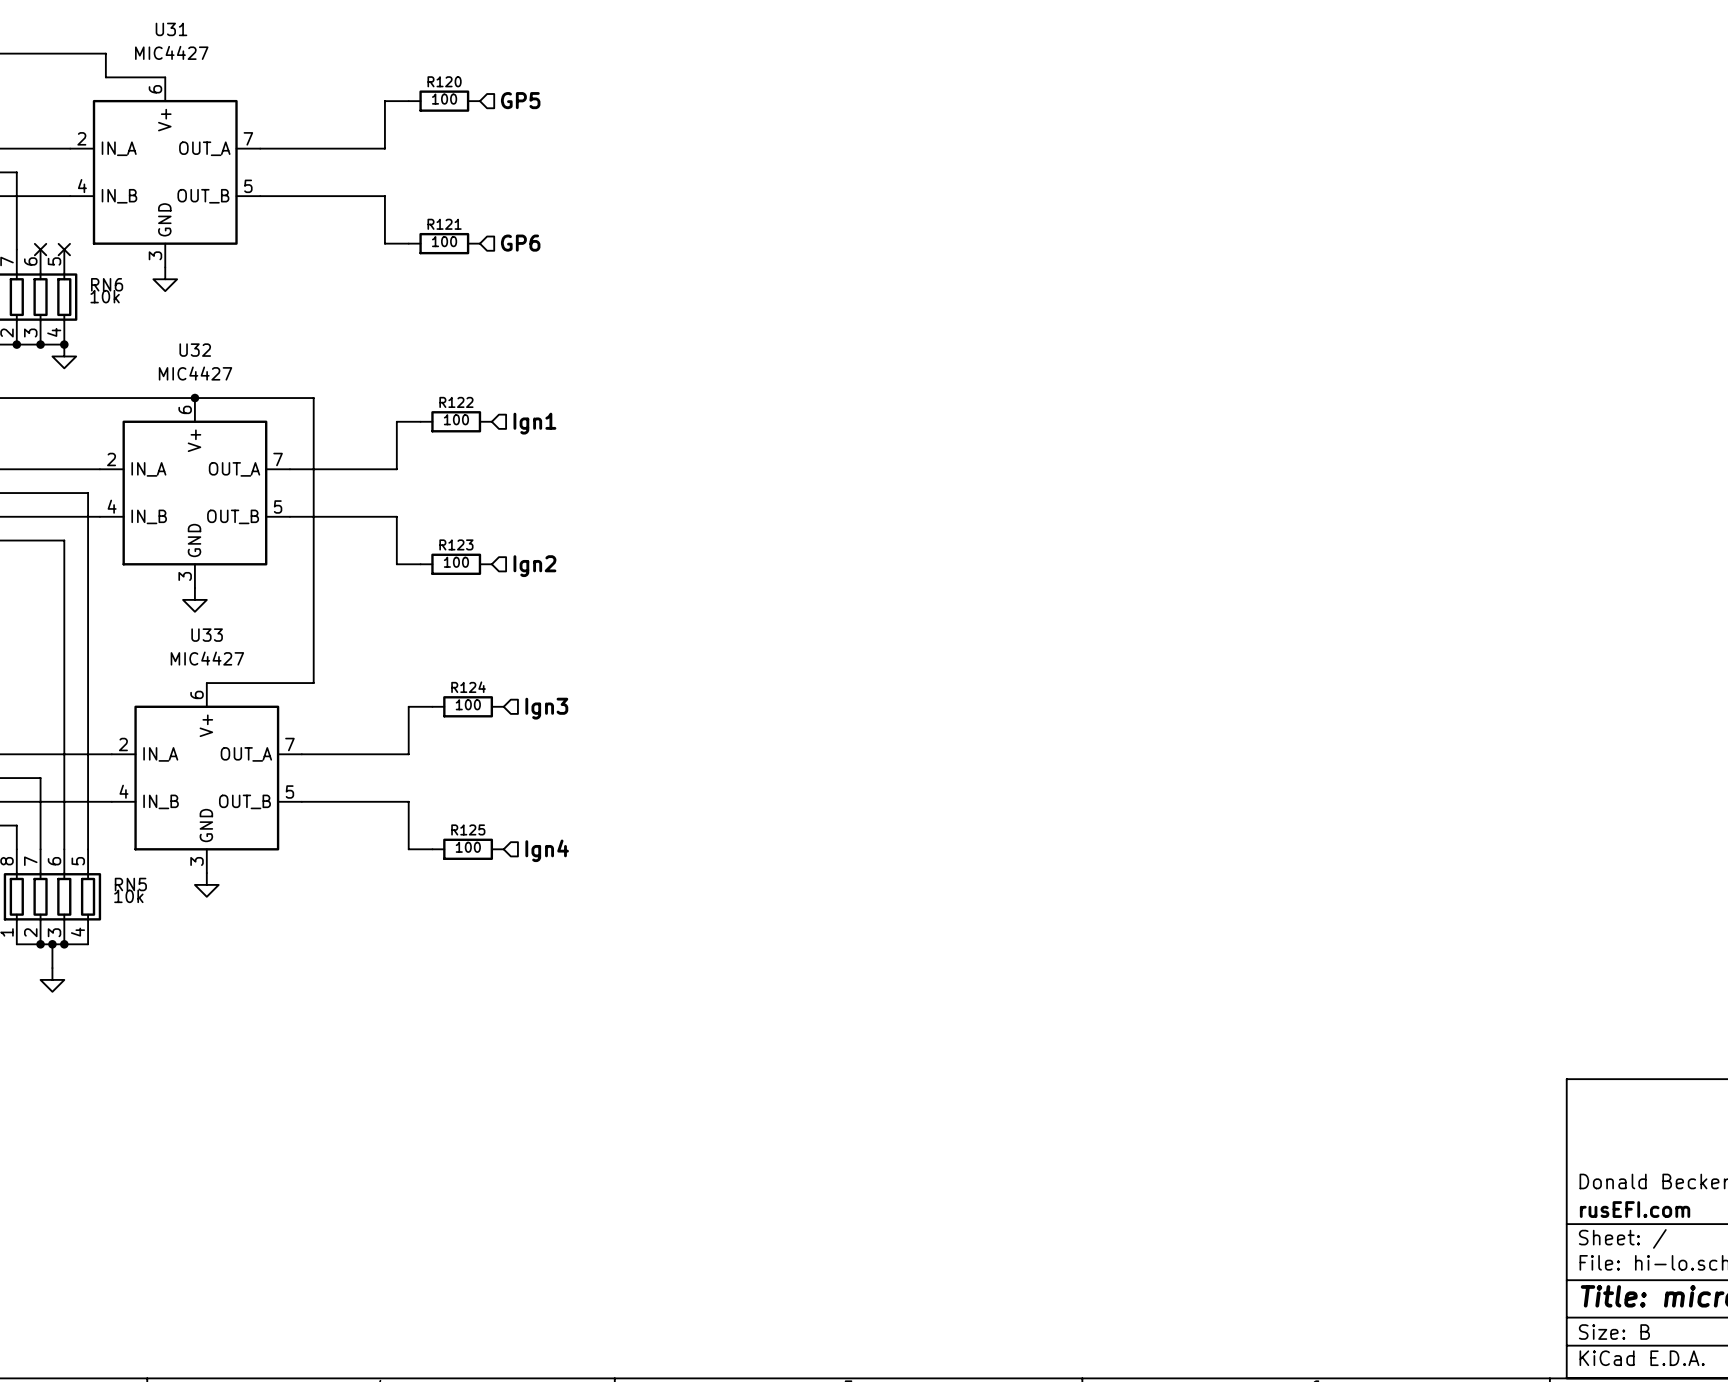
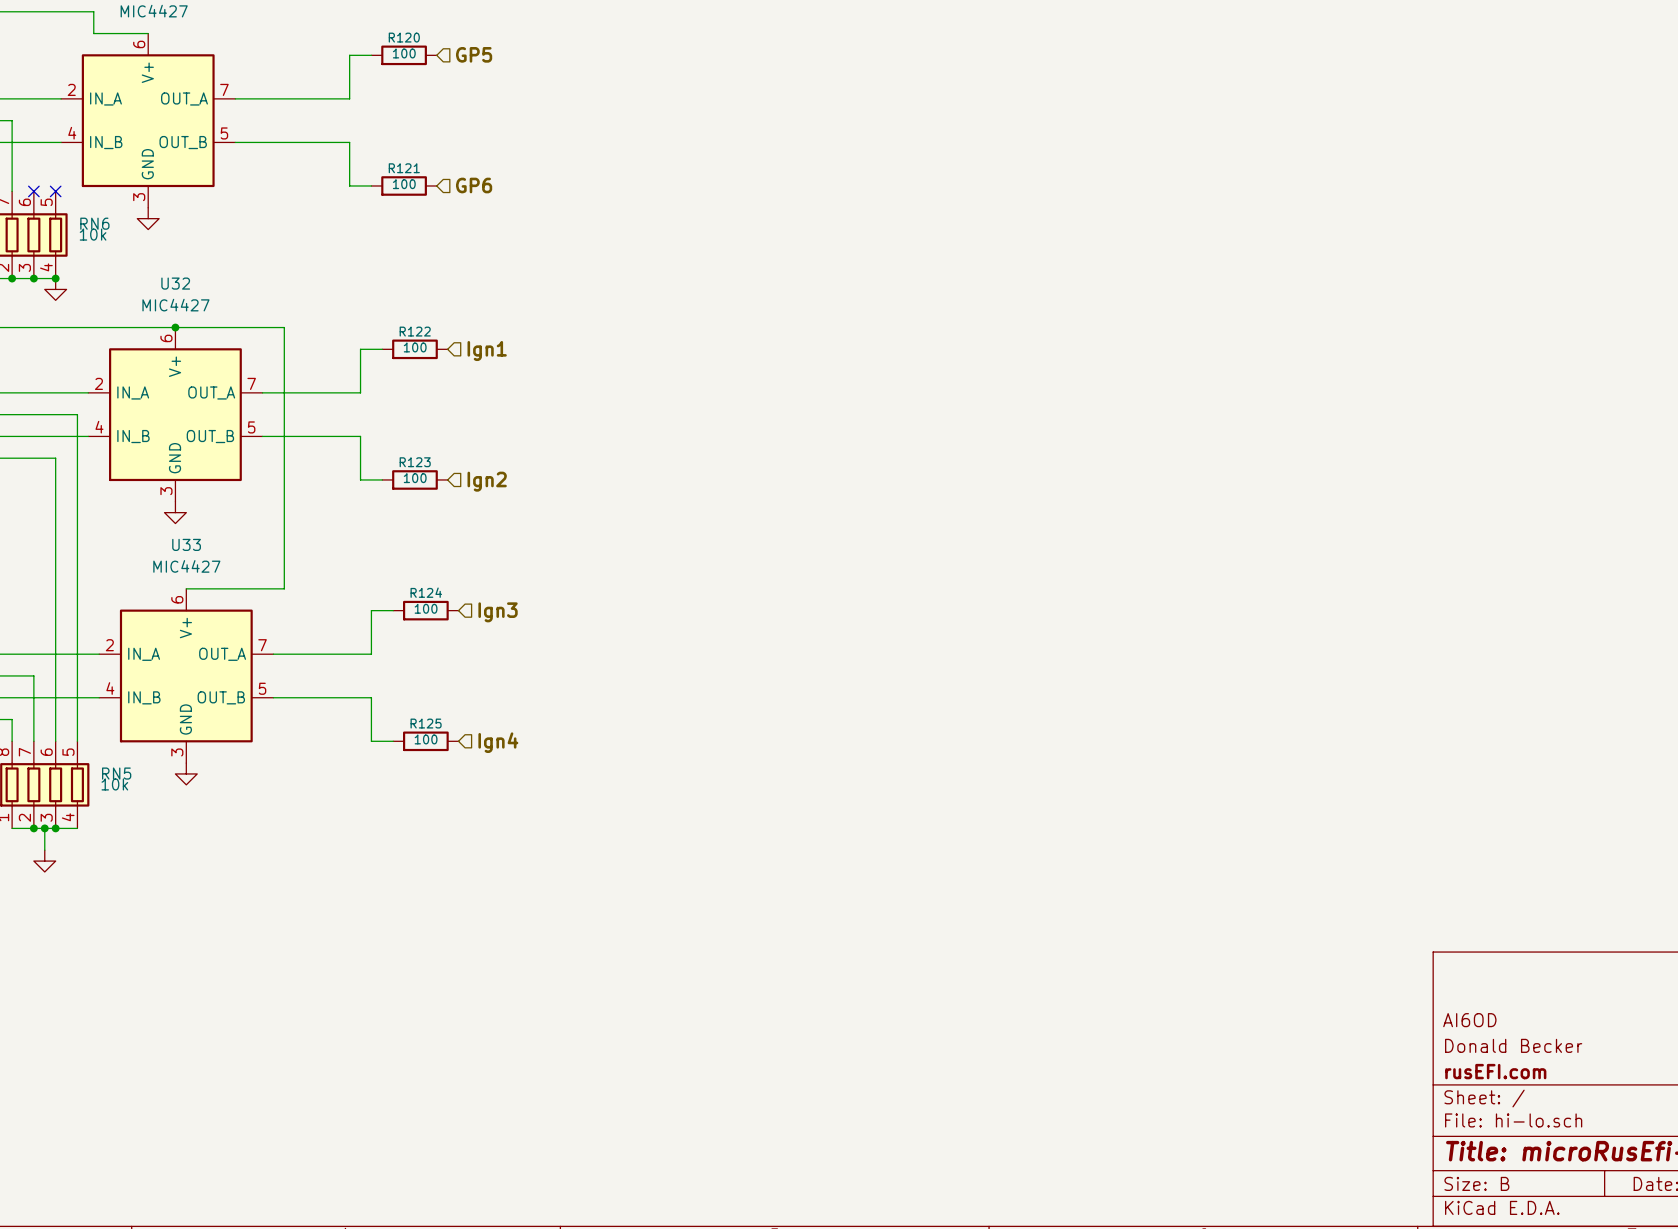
title block: none -> AI6OD (1469, 1020)

